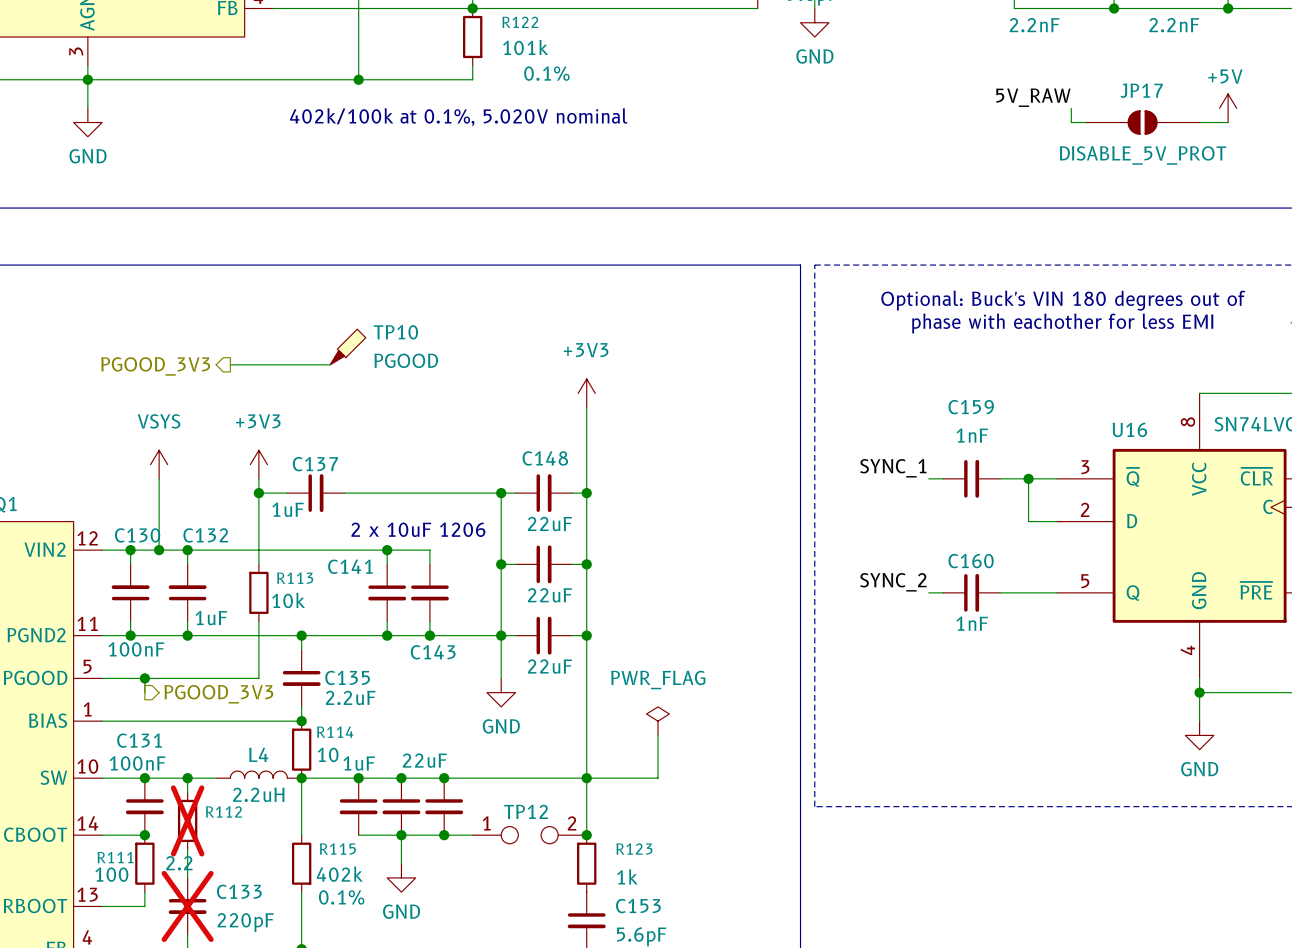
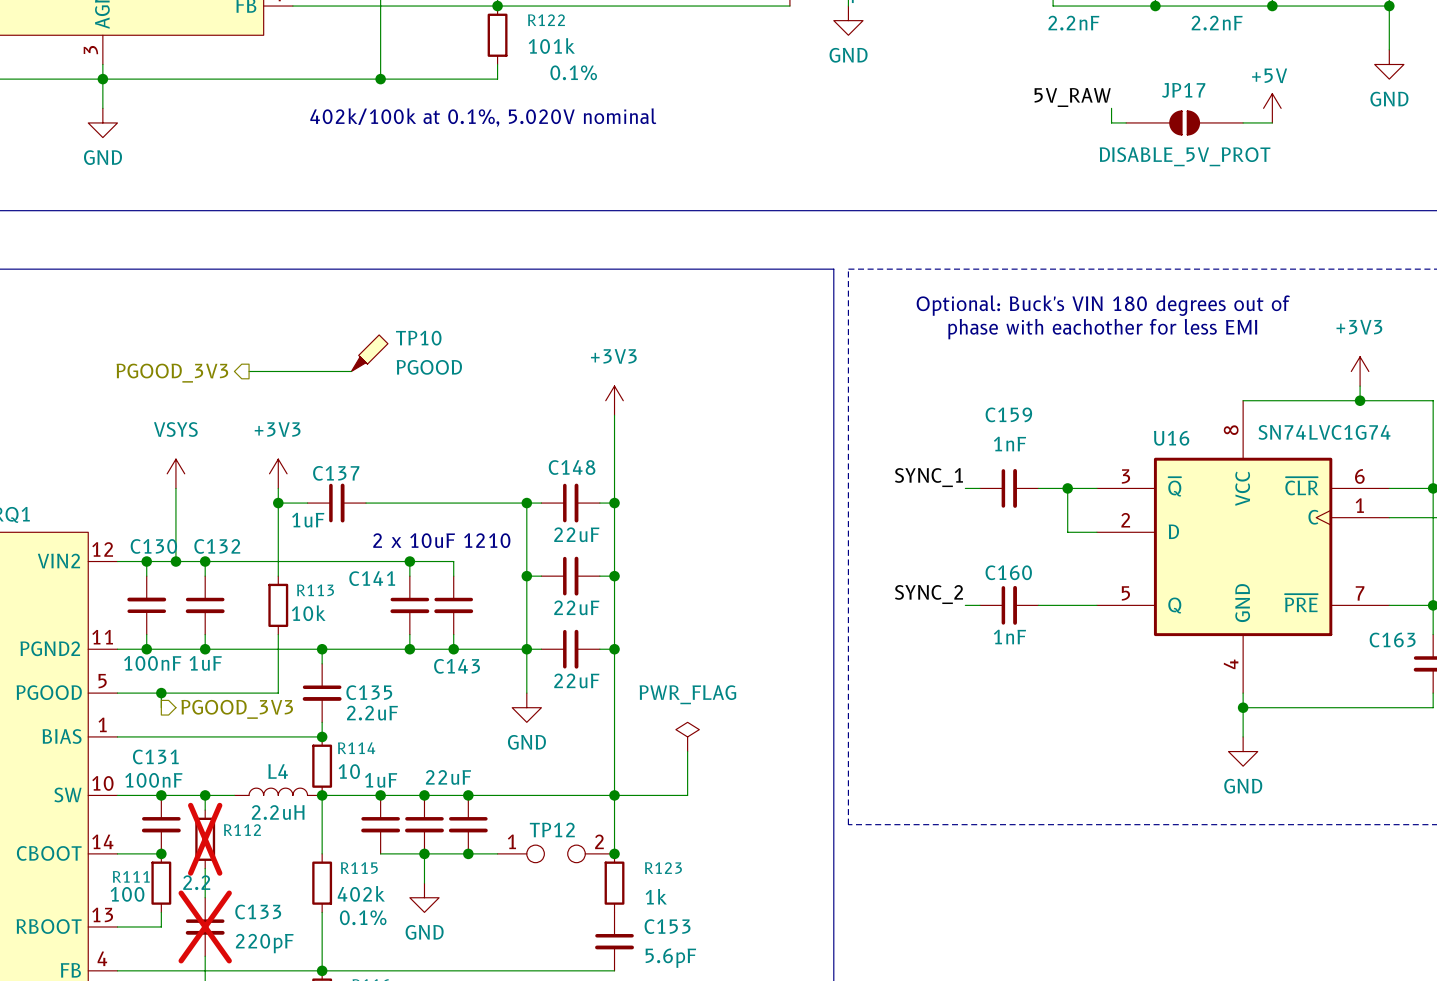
text: 2 x 10uF 1206 (418, 529) -> 2 x 10uF 1210 (441, 540)
C132 rotation: 0° (187, 592) -> 180° (205, 605)
C132 value position: 1uF (211, 618) -> 1uF (205, 663)

